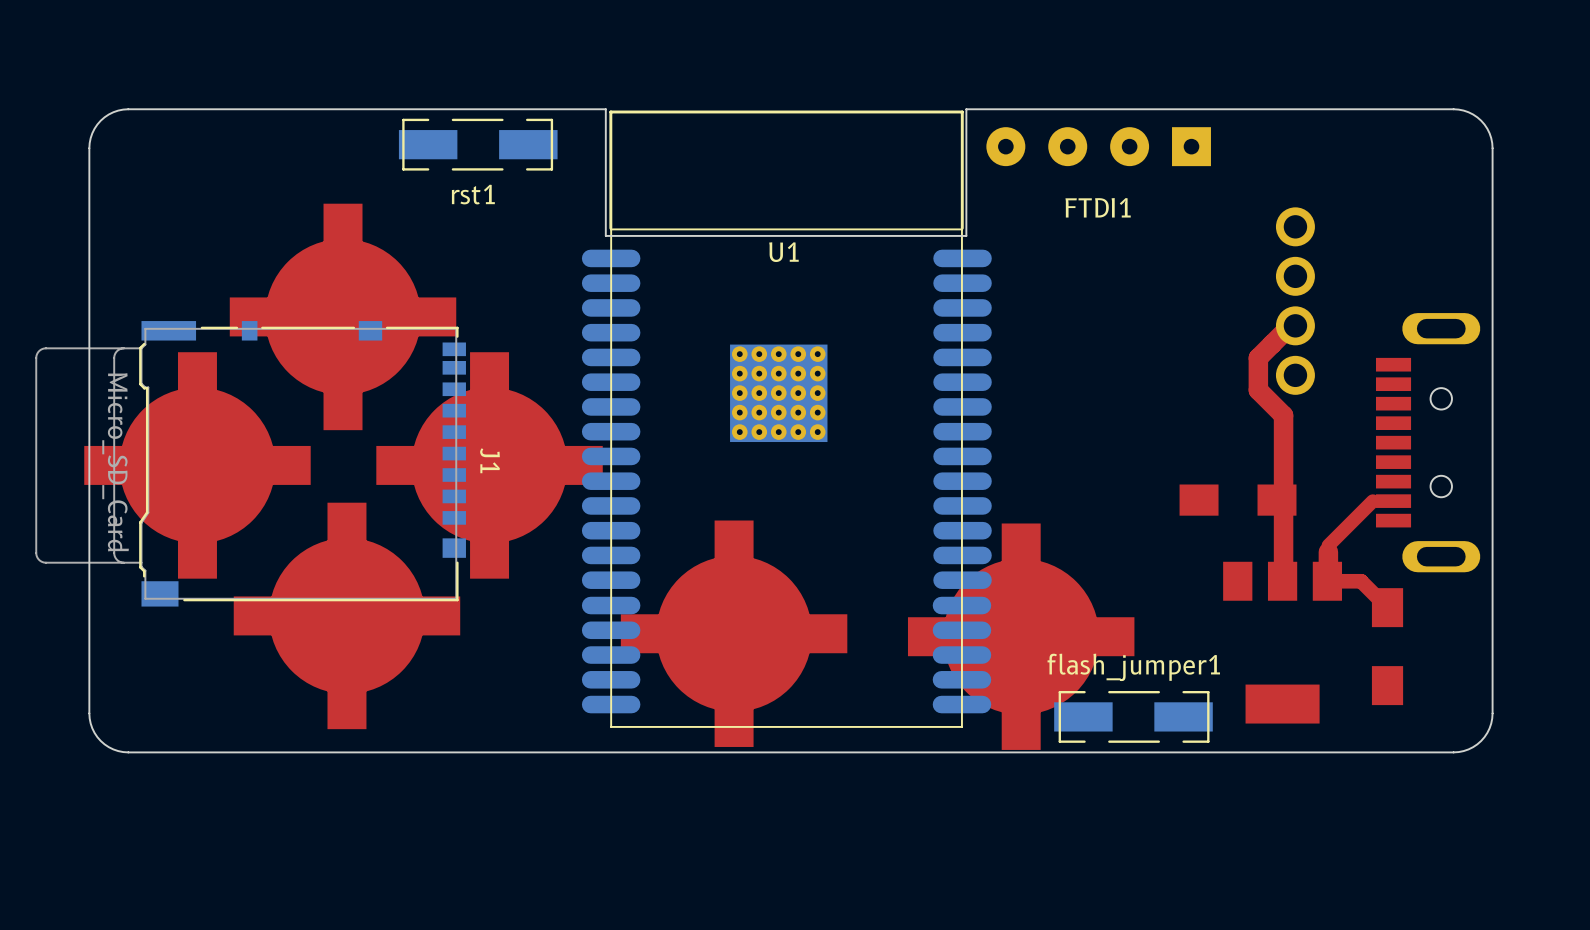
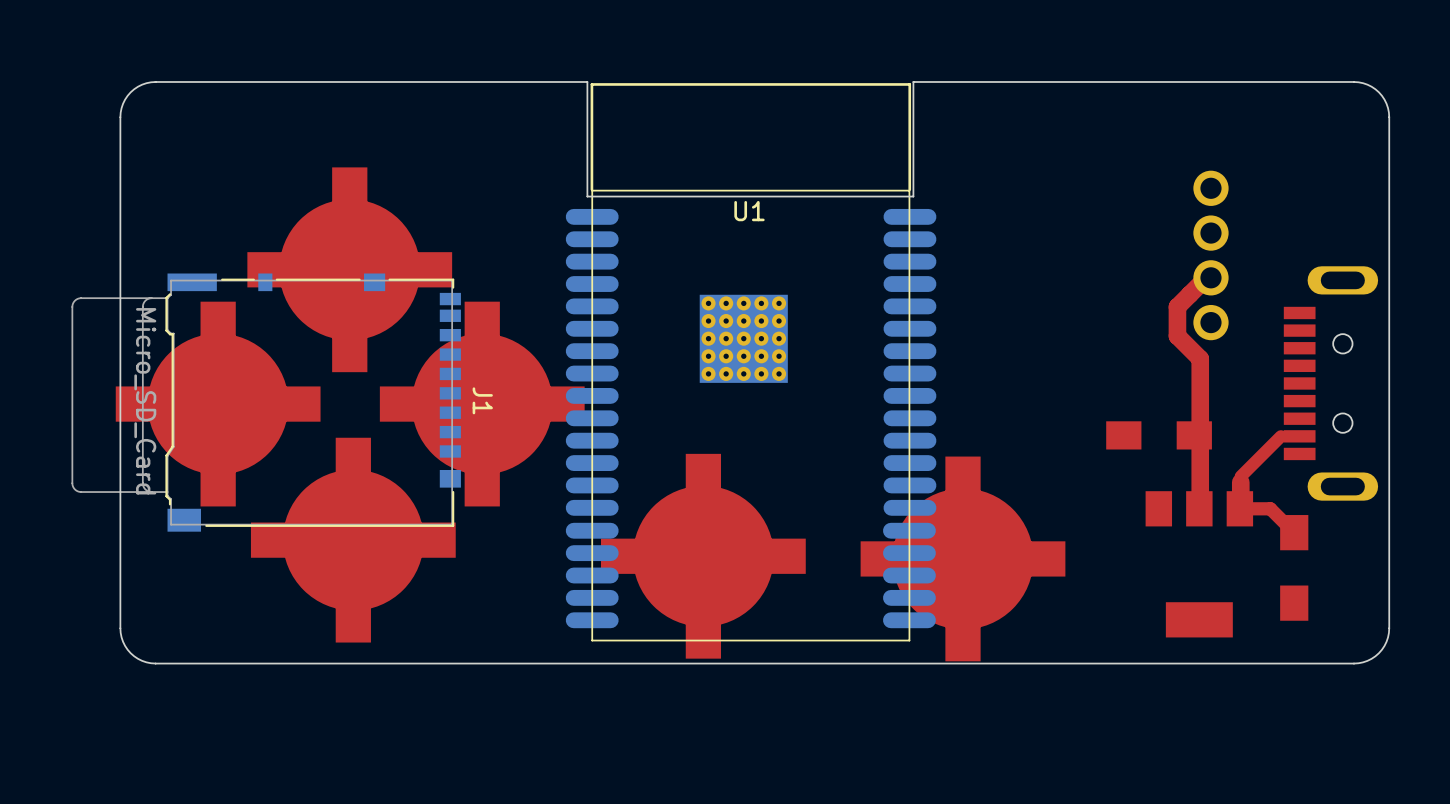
rst1: (478, 144) -> none
FTDI1: (1098, 146) -> none
flash_jumper1: (1133, 716) -> none

